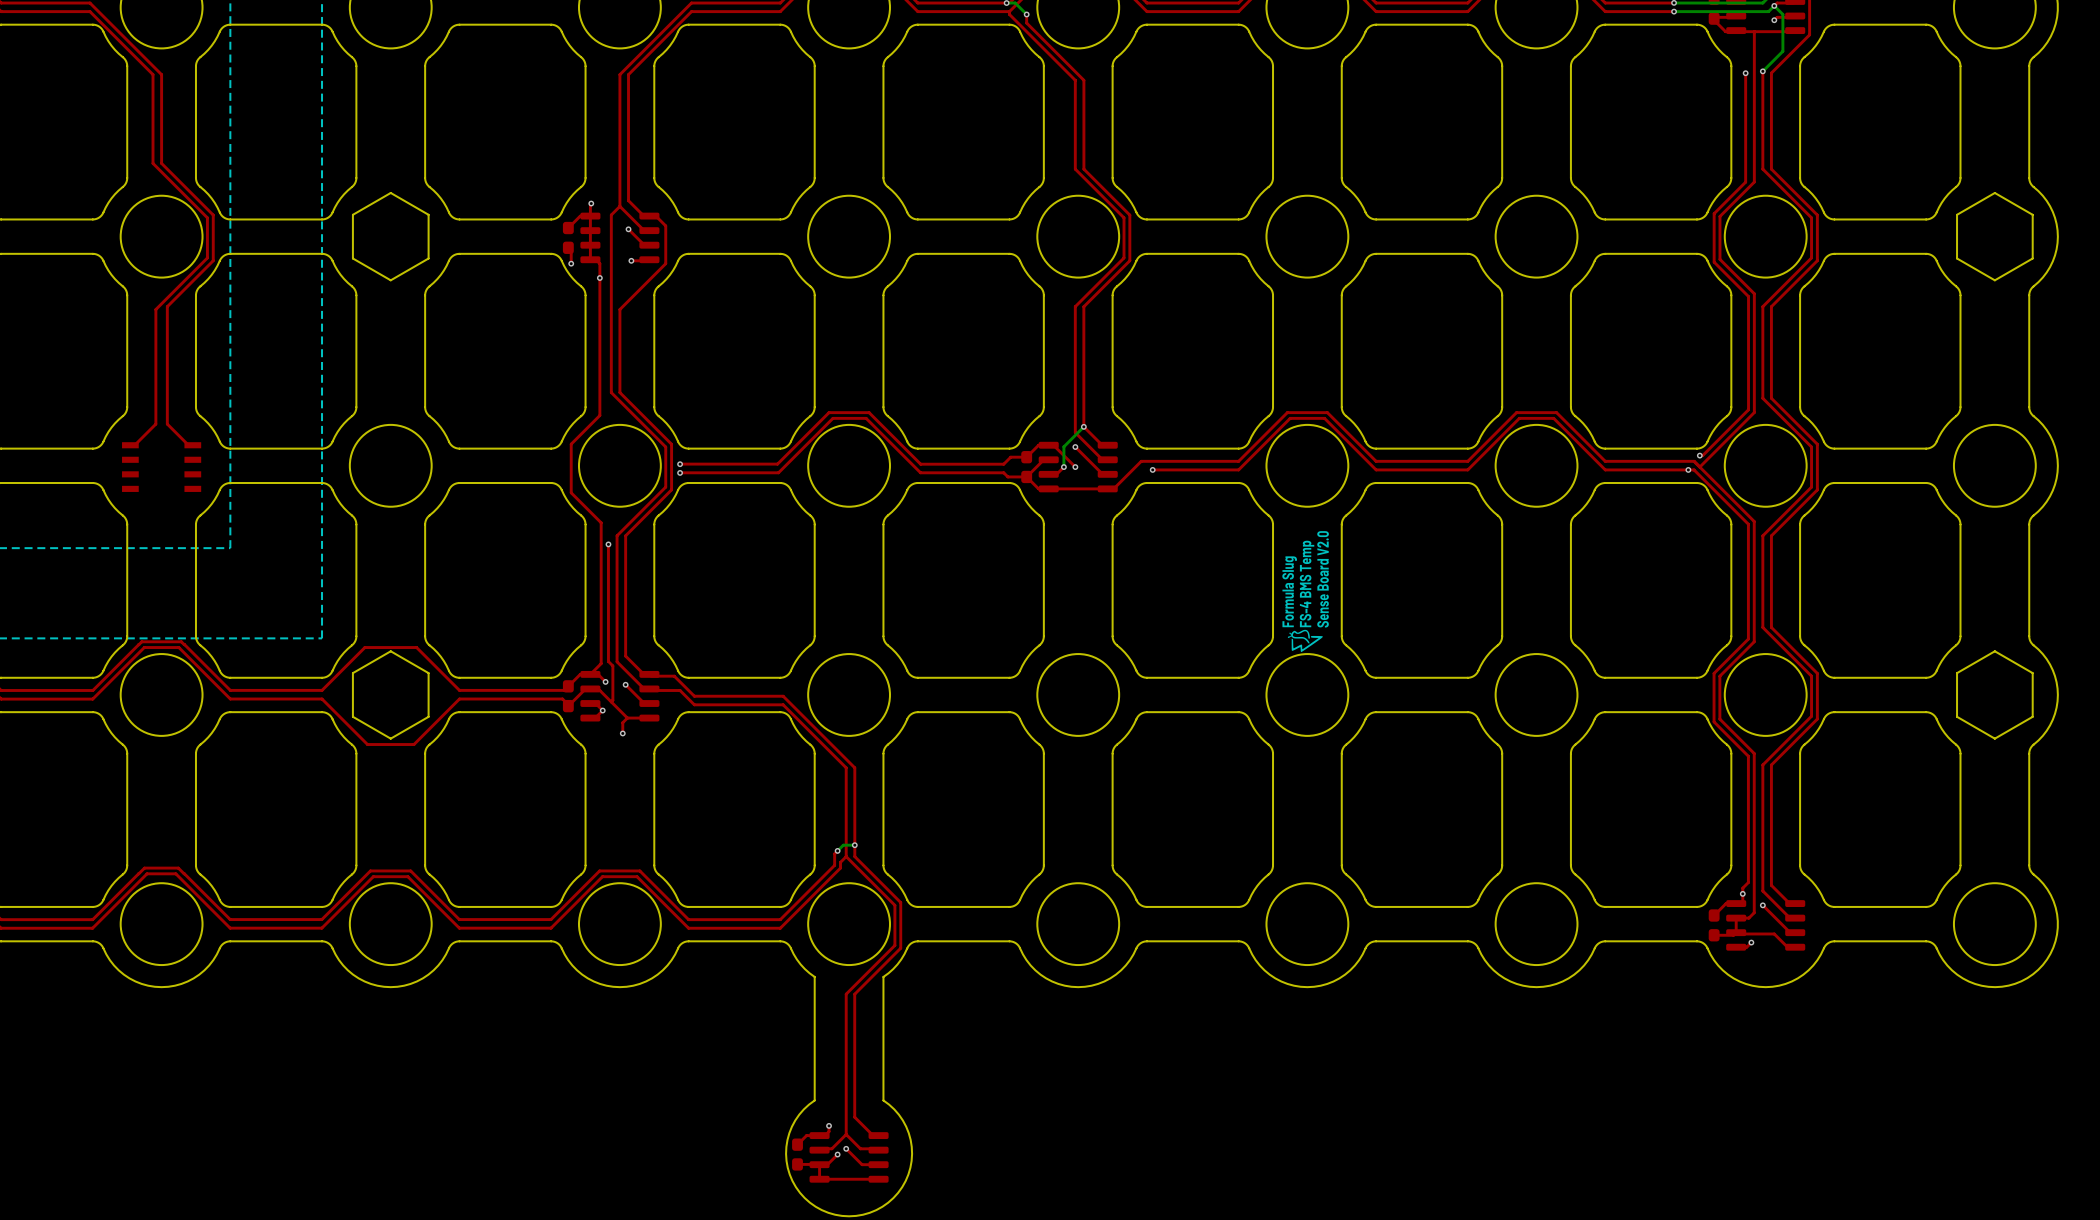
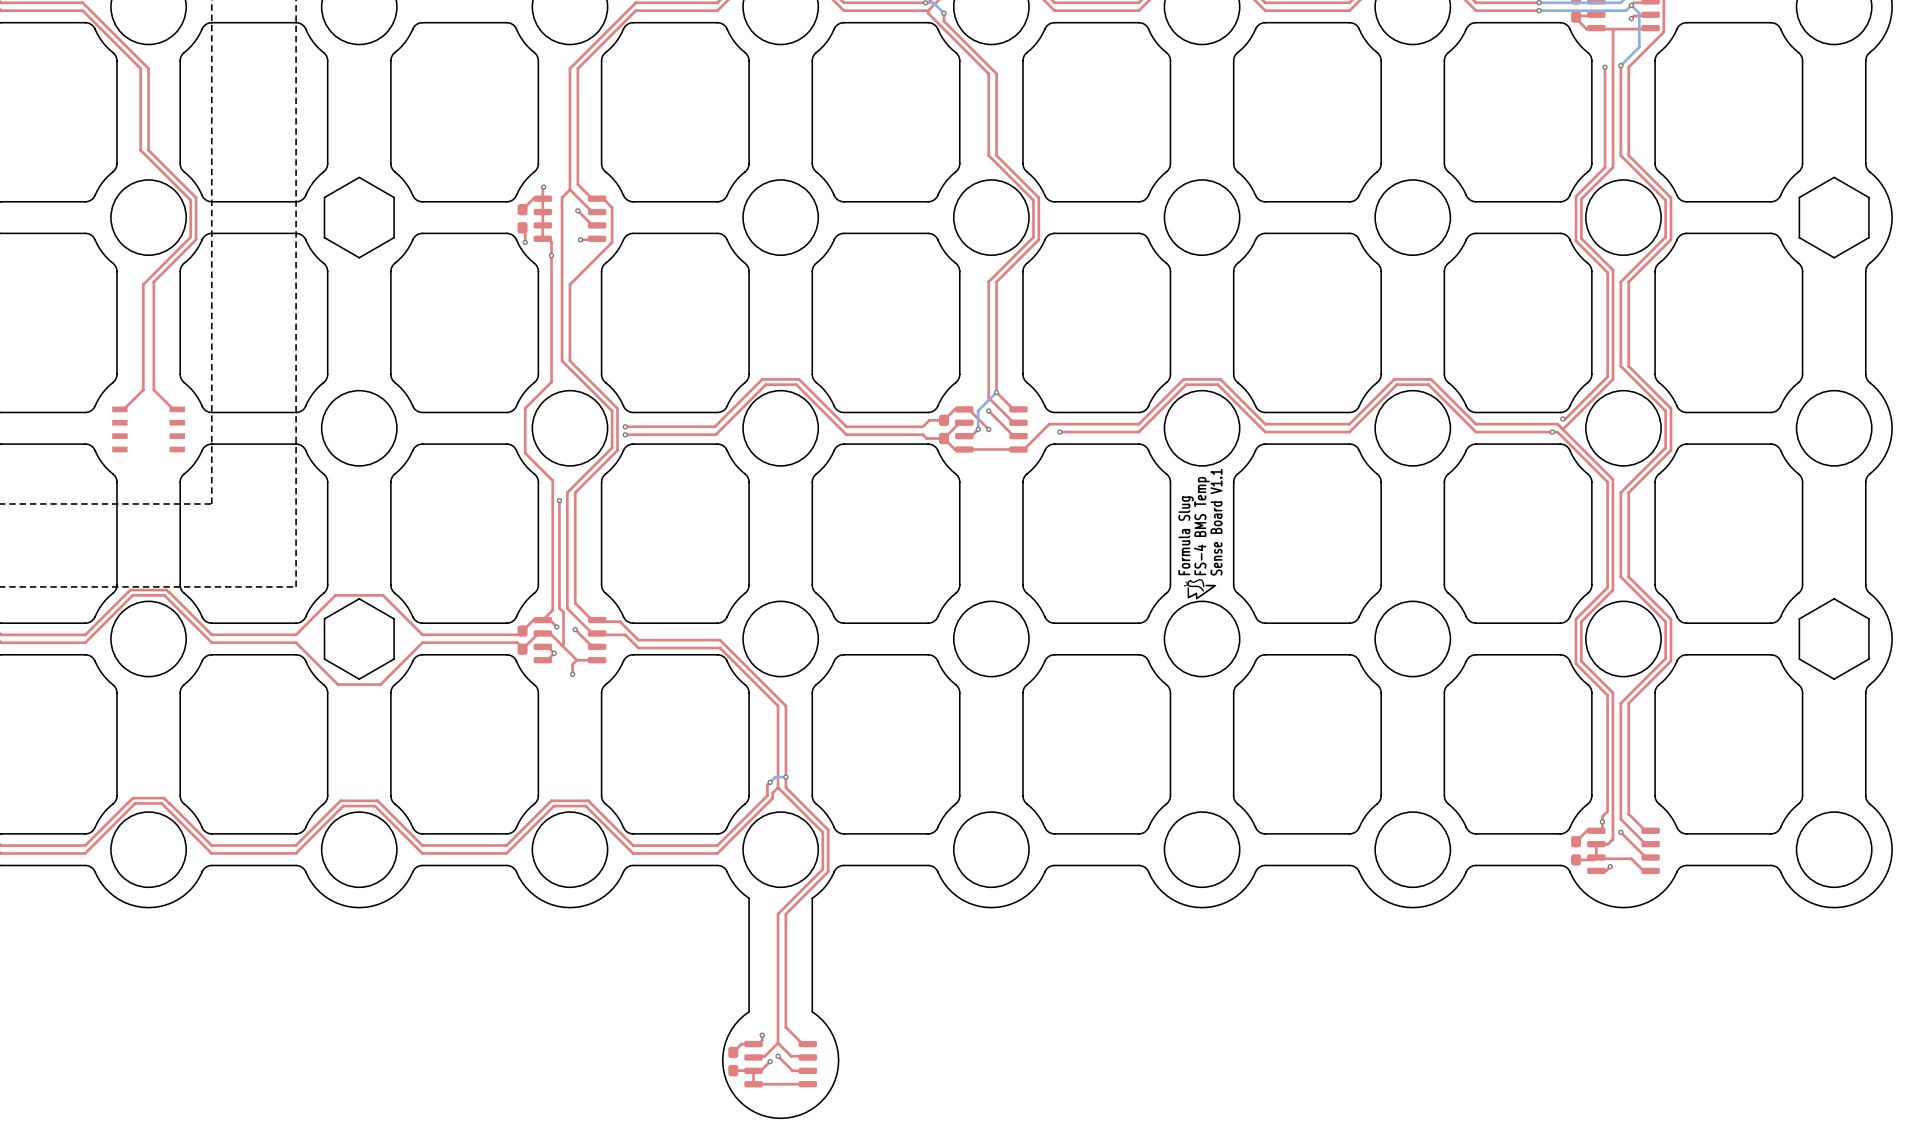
drawing shape: [1282, 531, 1329, 653] -> [1178, 468, 1223, 600]

